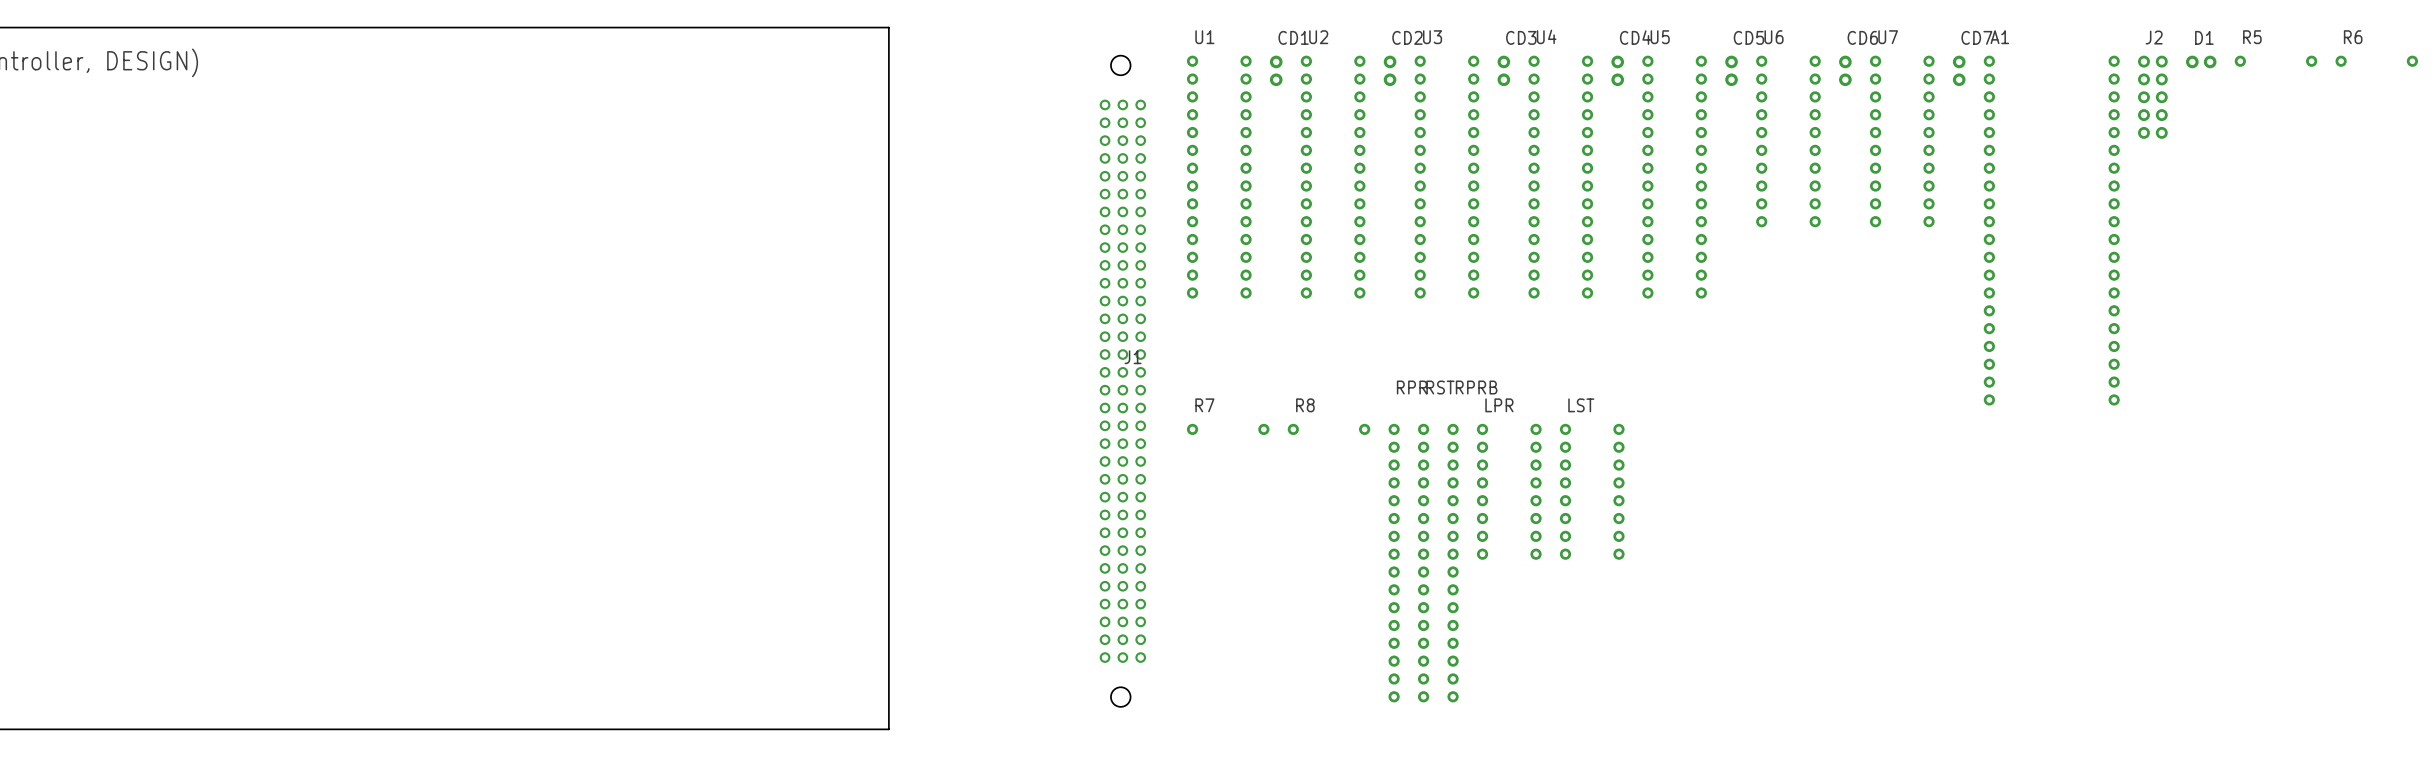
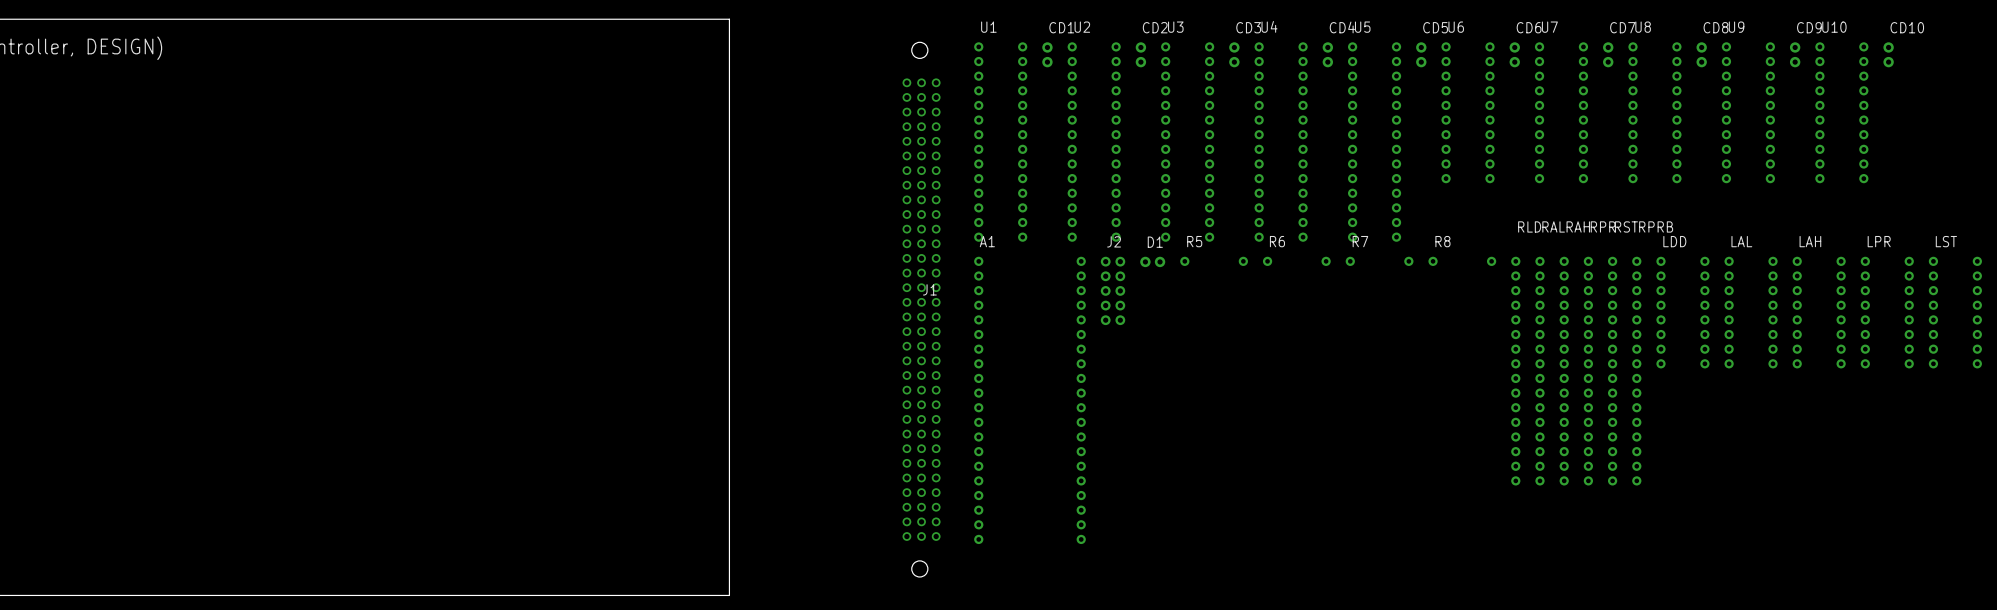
D1 position: (2201, 61) -> (1152, 261)
R5 position: (2275, 61) -> (1214, 261)
R6 position: (2376, 61) -> (1296, 261)
CD8: none -> (1701, 54)
CD9: none -> (1795, 54)
CD10: none -> (1888, 54)
J2 position: (2152, 97) -> (1113, 290)
U8: none -> (1654, 112)
U9: none -> (1748, 112)
U10: none -> (1841, 112)
A1 position: (2051, 230) -> (1029, 400)
LDD: none -> (1682, 312)
LAL: none -> (1751, 312)
LAH: none -> (1819, 312)
LPR: none -> (1887, 312)
LST: none -> (1955, 312)
R7 position: (1228, 429) -> (1379, 261)
R8 position: (1328, 429) -> (1462, 261)
RLD: none -> (1515, 371)
RAL: none -> (1539, 371)
RAH: none -> (1564, 371)
RPR: none -> (1588, 371)
RST: none -> (1612, 371)
RPRB: none -> (1636, 371)
LPR: (1509, 491) -> none
LST: (1592, 491) -> none
RPR: (1394, 563) -> none
RST: (1423, 563) -> none
RPRB: (1453, 563) -> none

